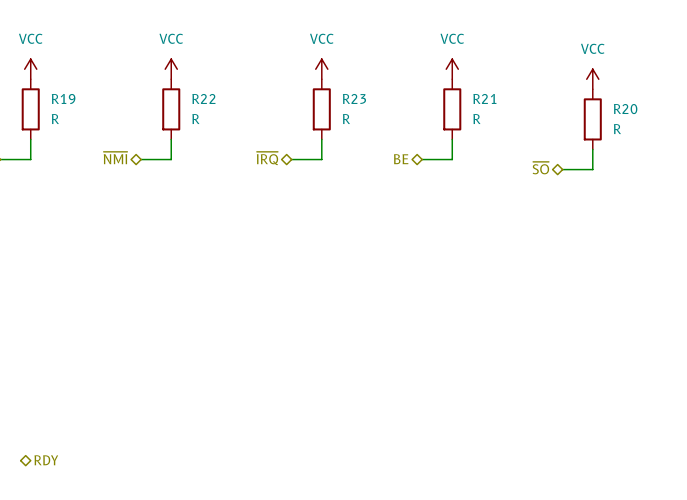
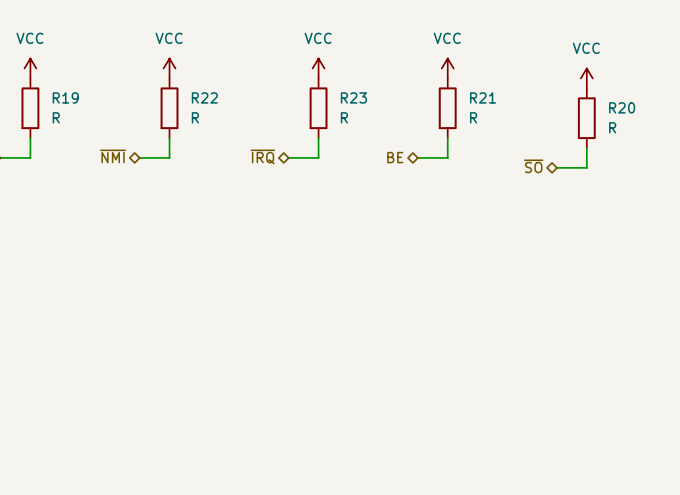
hierarchical label: RDY (46, 460) -> none

